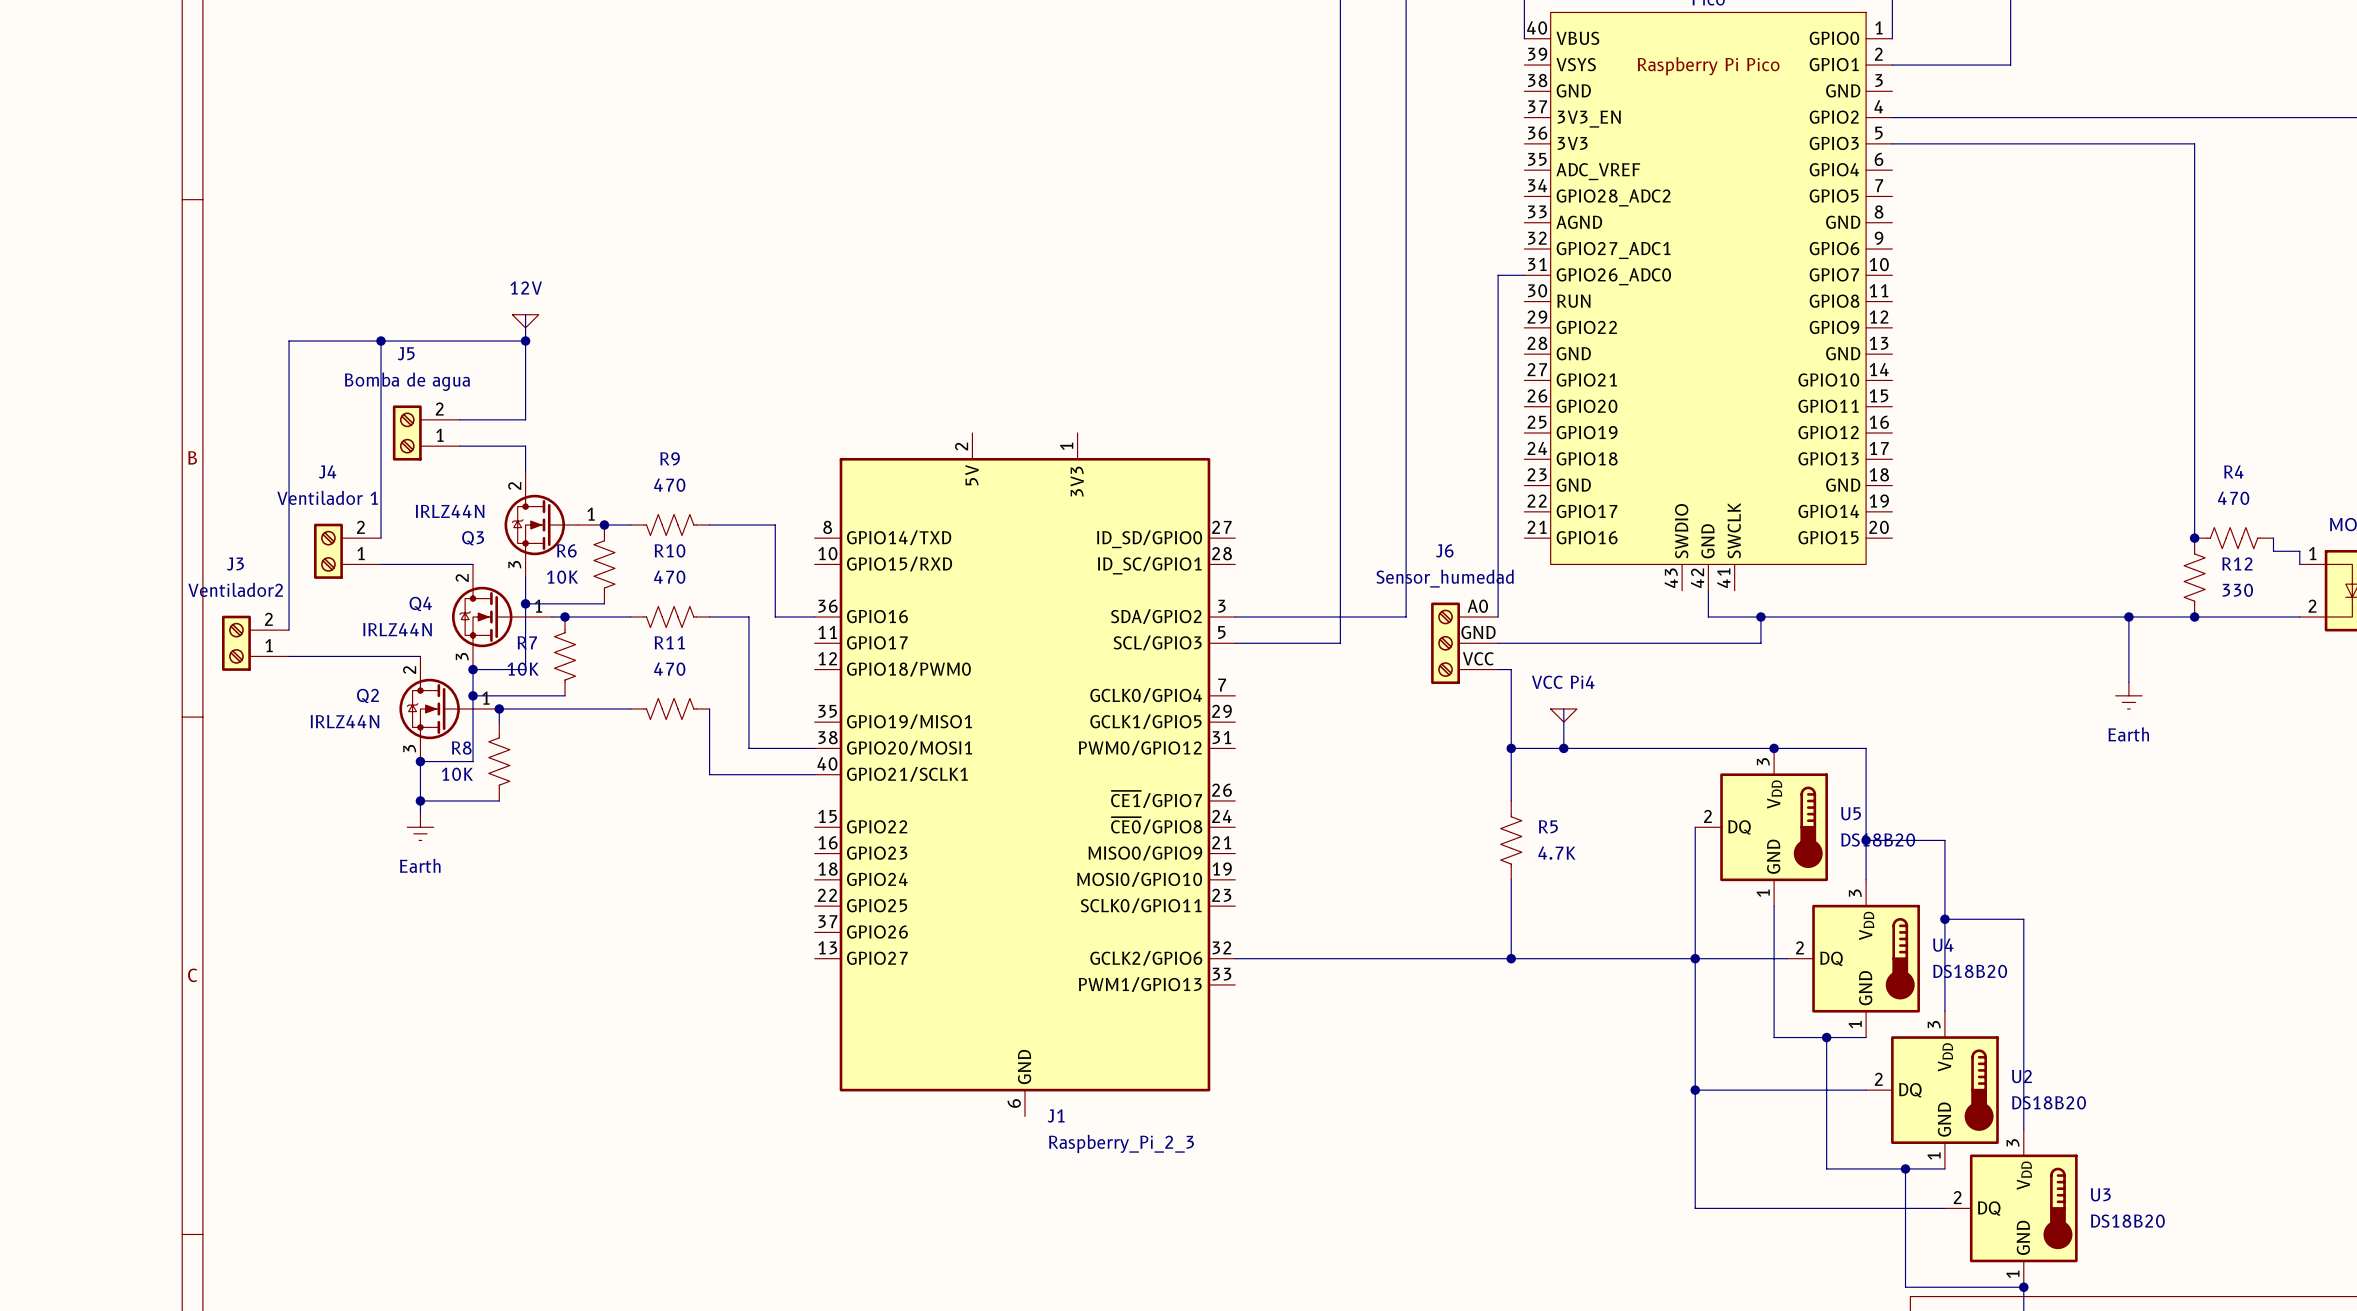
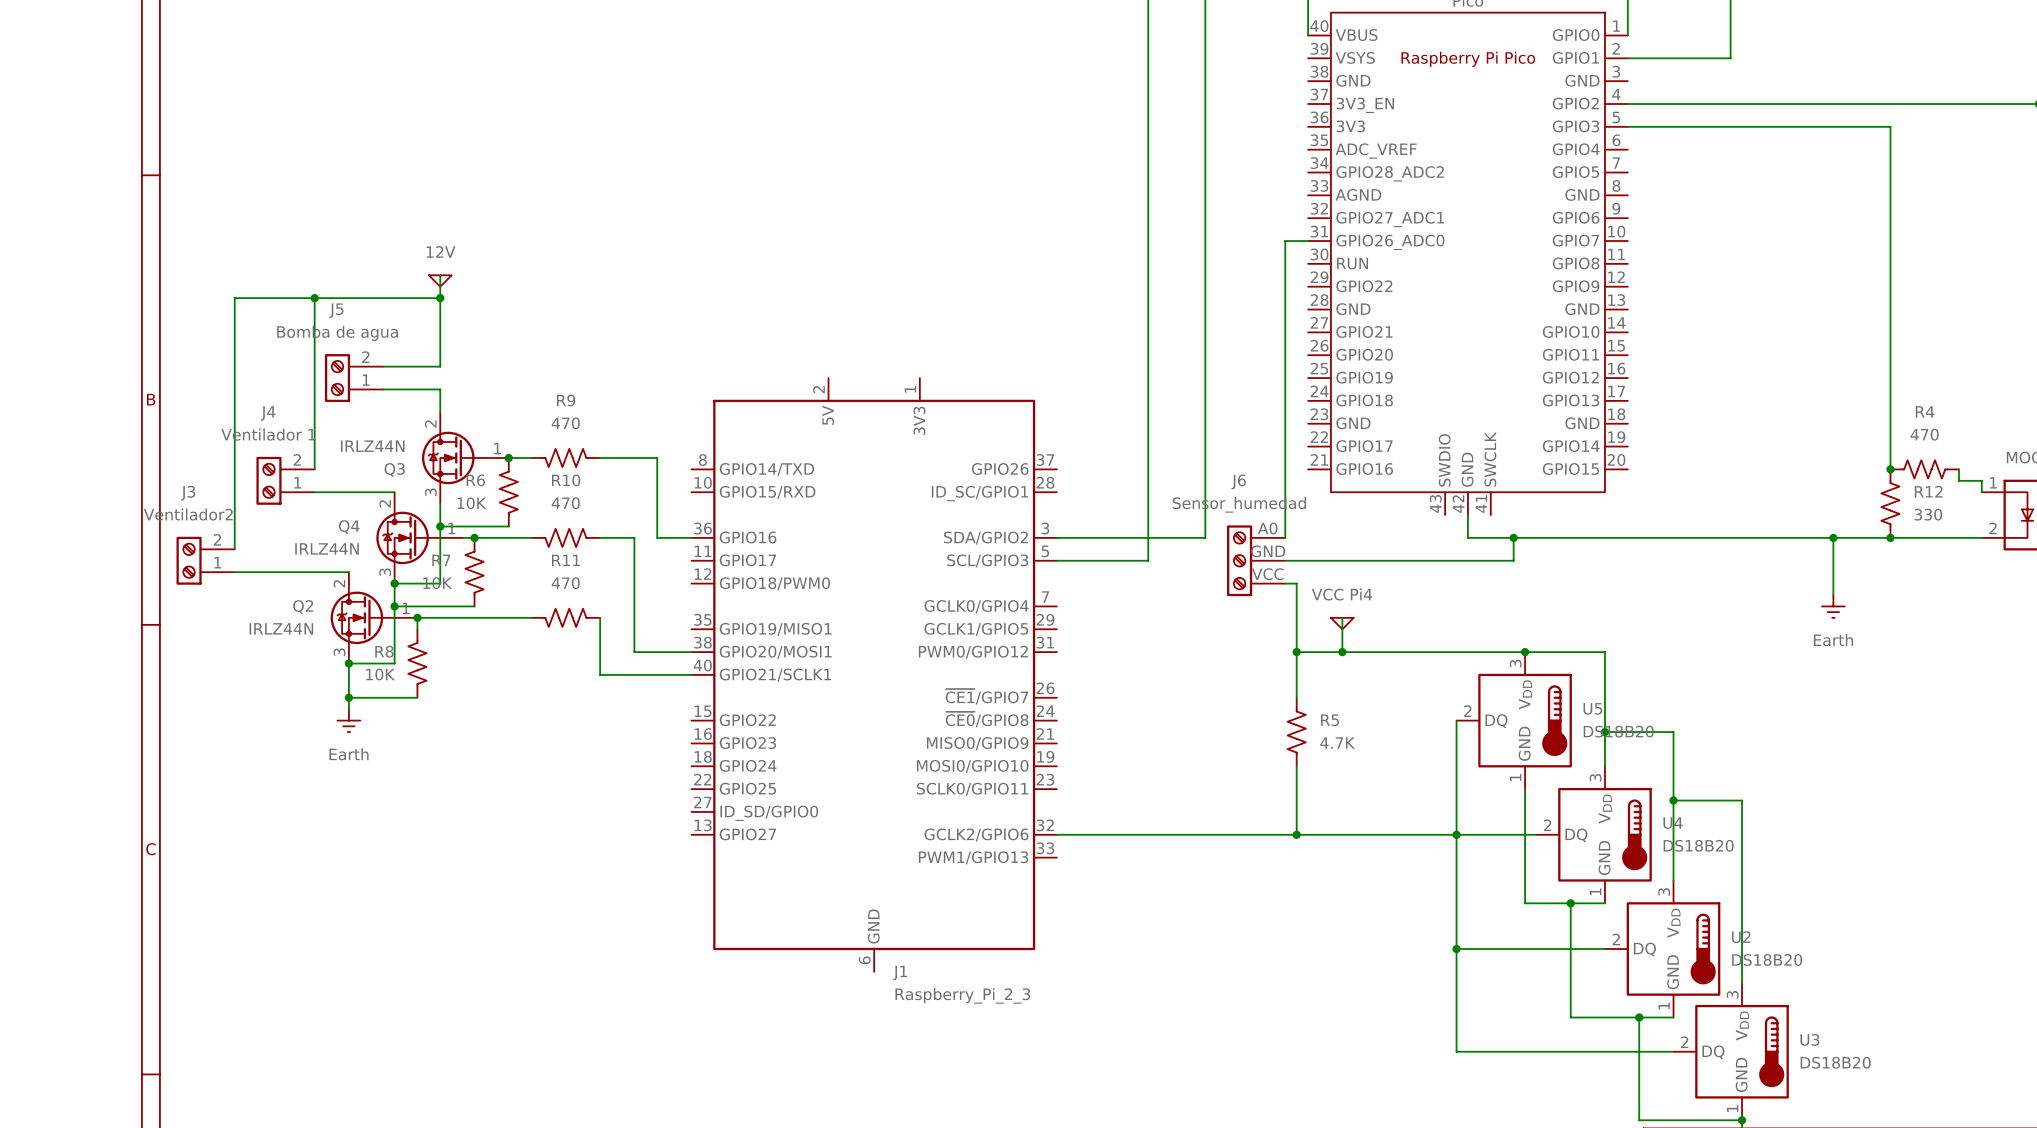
J1 pin number: 27 (1221, 527) -> 37 (1045, 459)
J1 pin name: ID_SD/GPIO0 (1149, 539) -> GPIO26 (1000, 468)
J1 pin number: 37 (827, 921) -> 27 (702, 802)
J1 pin name: GPIO26 (877, 931) -> ID_SD/GPIO0 (769, 813)

